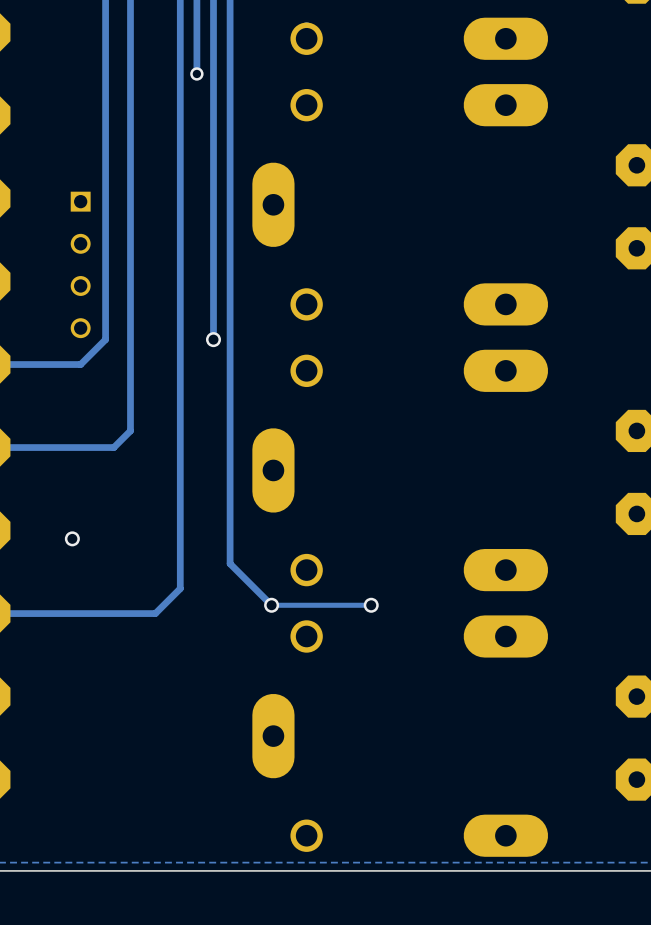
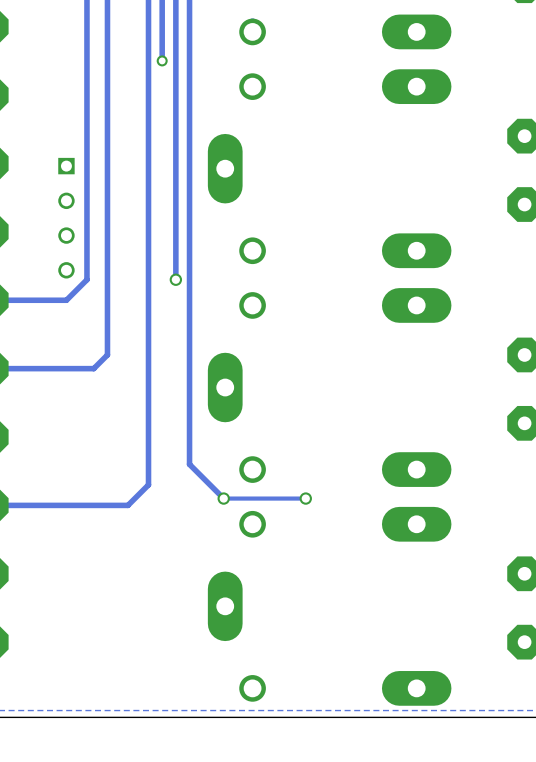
via: (72, 538) -> none

